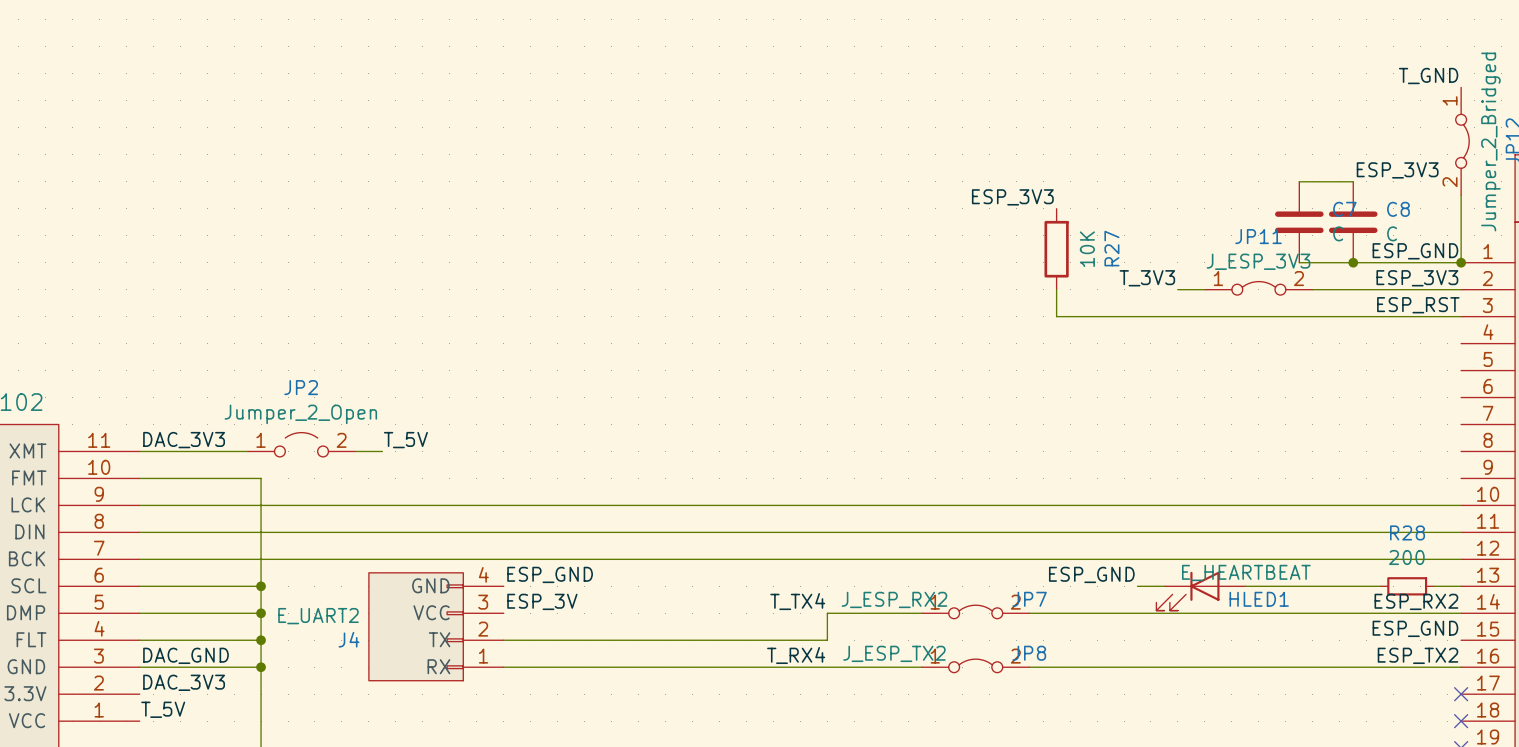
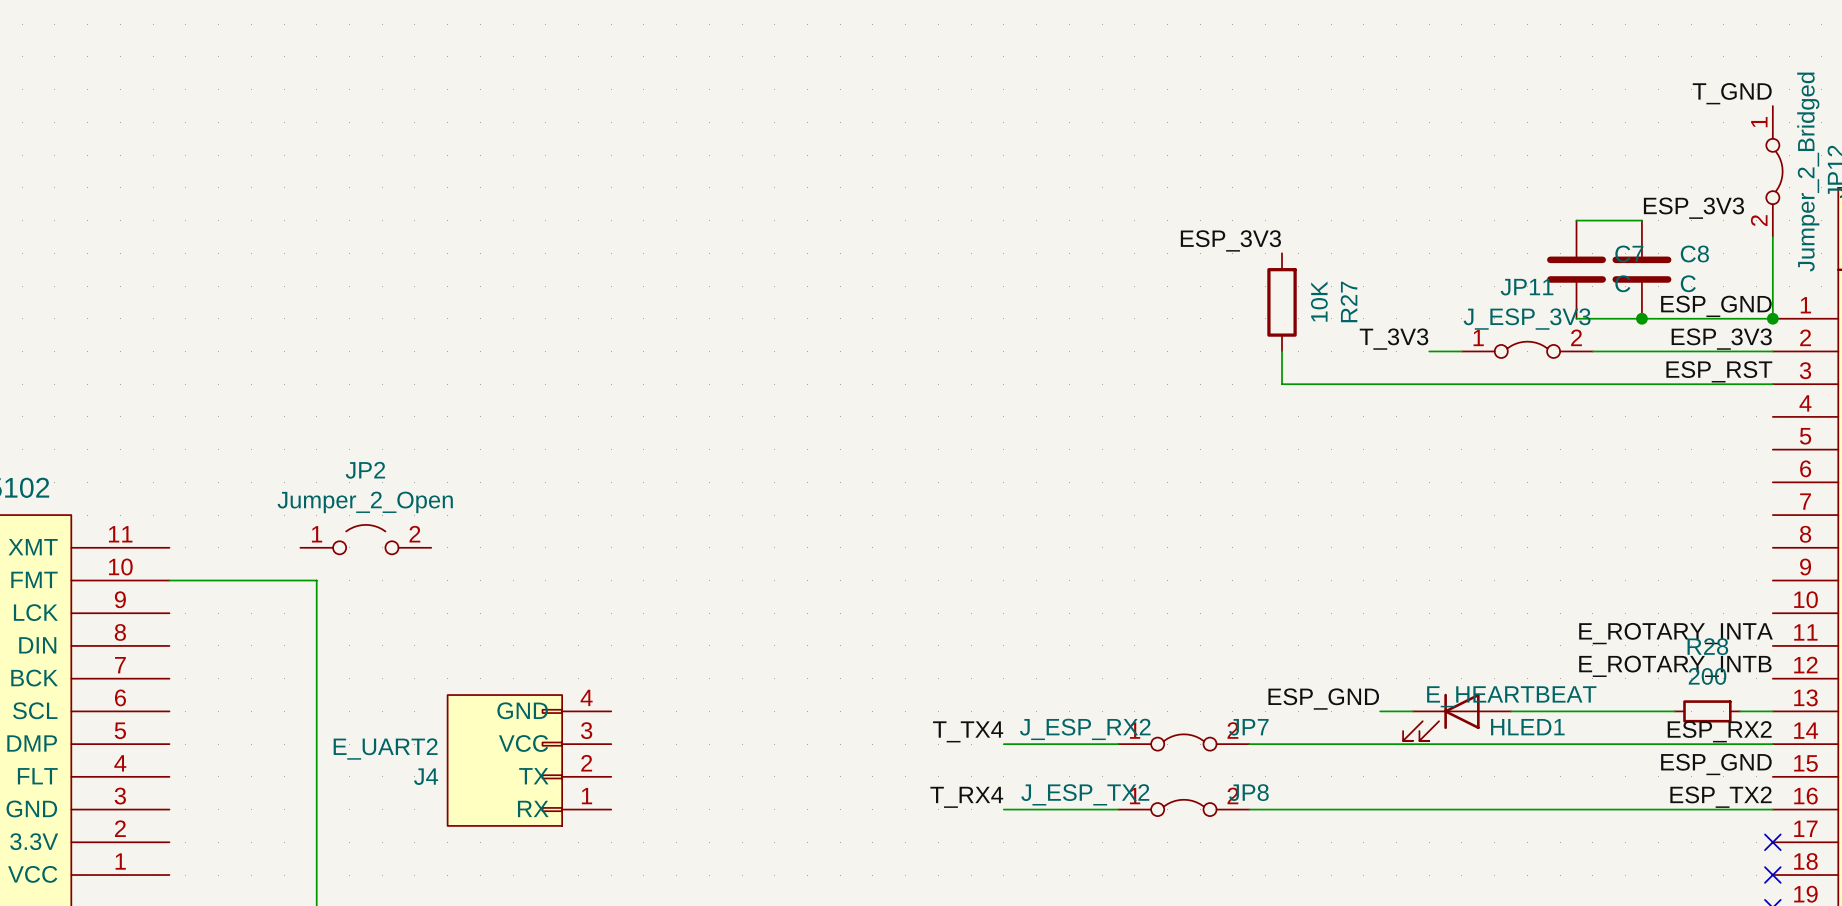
label: DAC_3V3 (184, 440) -> none
label: T_5V (405, 440) -> none
wire: (139, 451) (247, 451) -> none
wire: (355, 451) (382, 451) -> none
wire: (139, 505) (1461, 505) -> none
label: none -> E_ROTARY_INTA (1676, 633)
wire: (139, 532) (1461, 532) -> none
label: none -> E_ROTARY_INTB (1675, 666)
wire: (139, 559) (1461, 559) -> none
label: ESP_GND (550, 574) -> none
wire: (139, 586) (261, 586) -> none
junction: (261, 586) -> none
label: ESP_3V (542, 601) -> none
wire: (139, 613) (261, 613) -> none
junction: (261, 613) -> none
wire: (827, 613) (827, 640) (503, 640) -> none
wire: (139, 640) (261, 640) -> none
junction: (261, 640) -> none
label: DAC_GND (186, 655) -> none
wire: (139, 667) (261, 667) -> none
junction: (261, 667) -> none
wire: (503, 667) (827, 667) -> none
label: DAC_3V3 (184, 682) -> none
label: T_5V (163, 709) -> none

